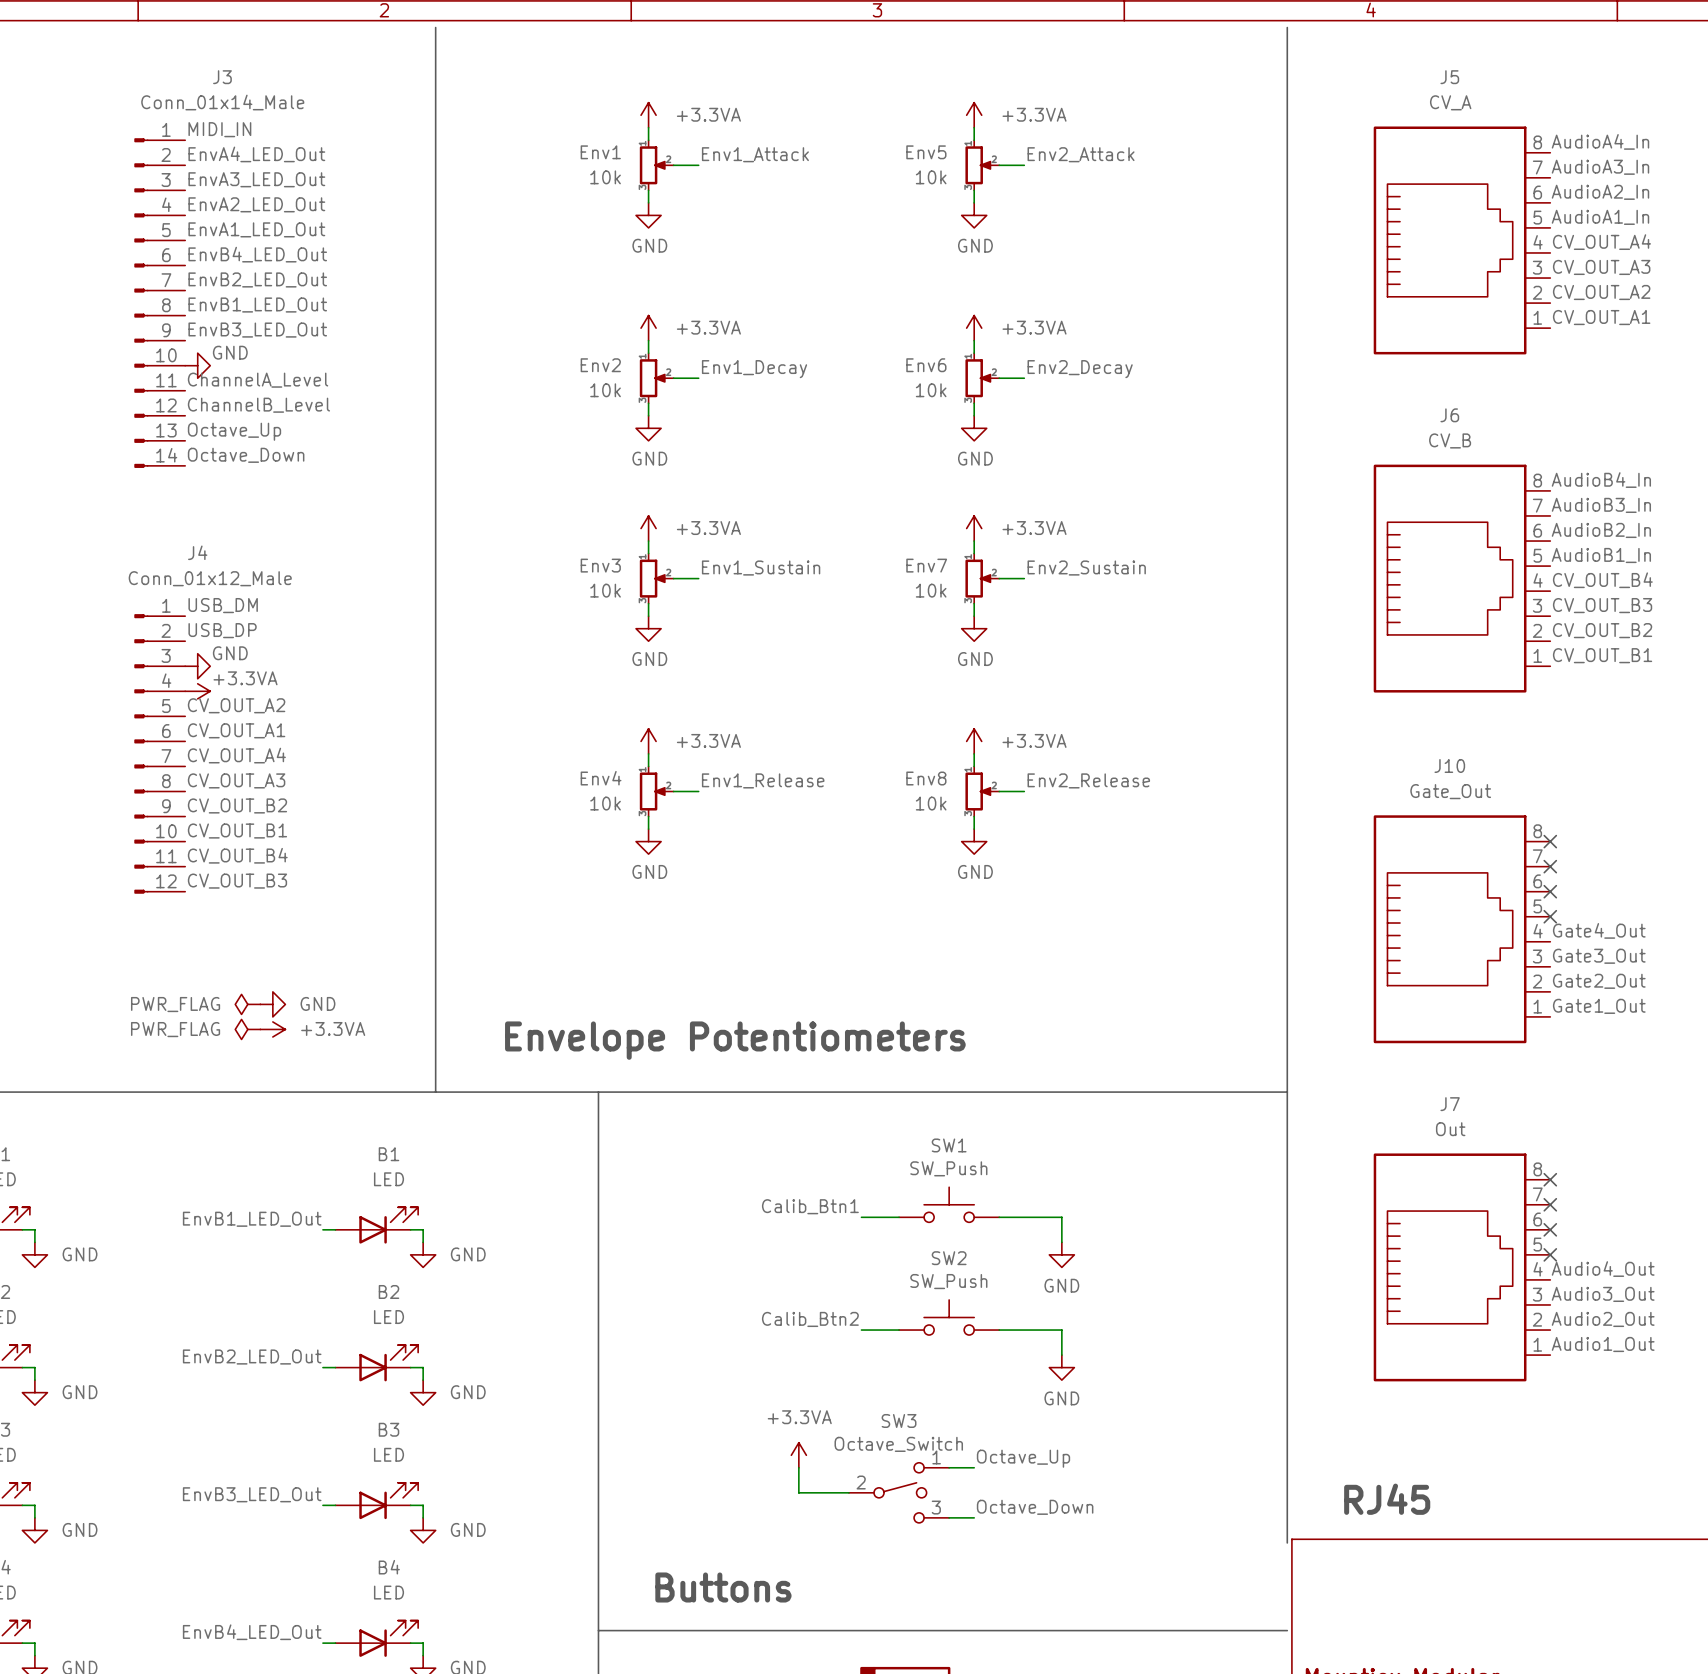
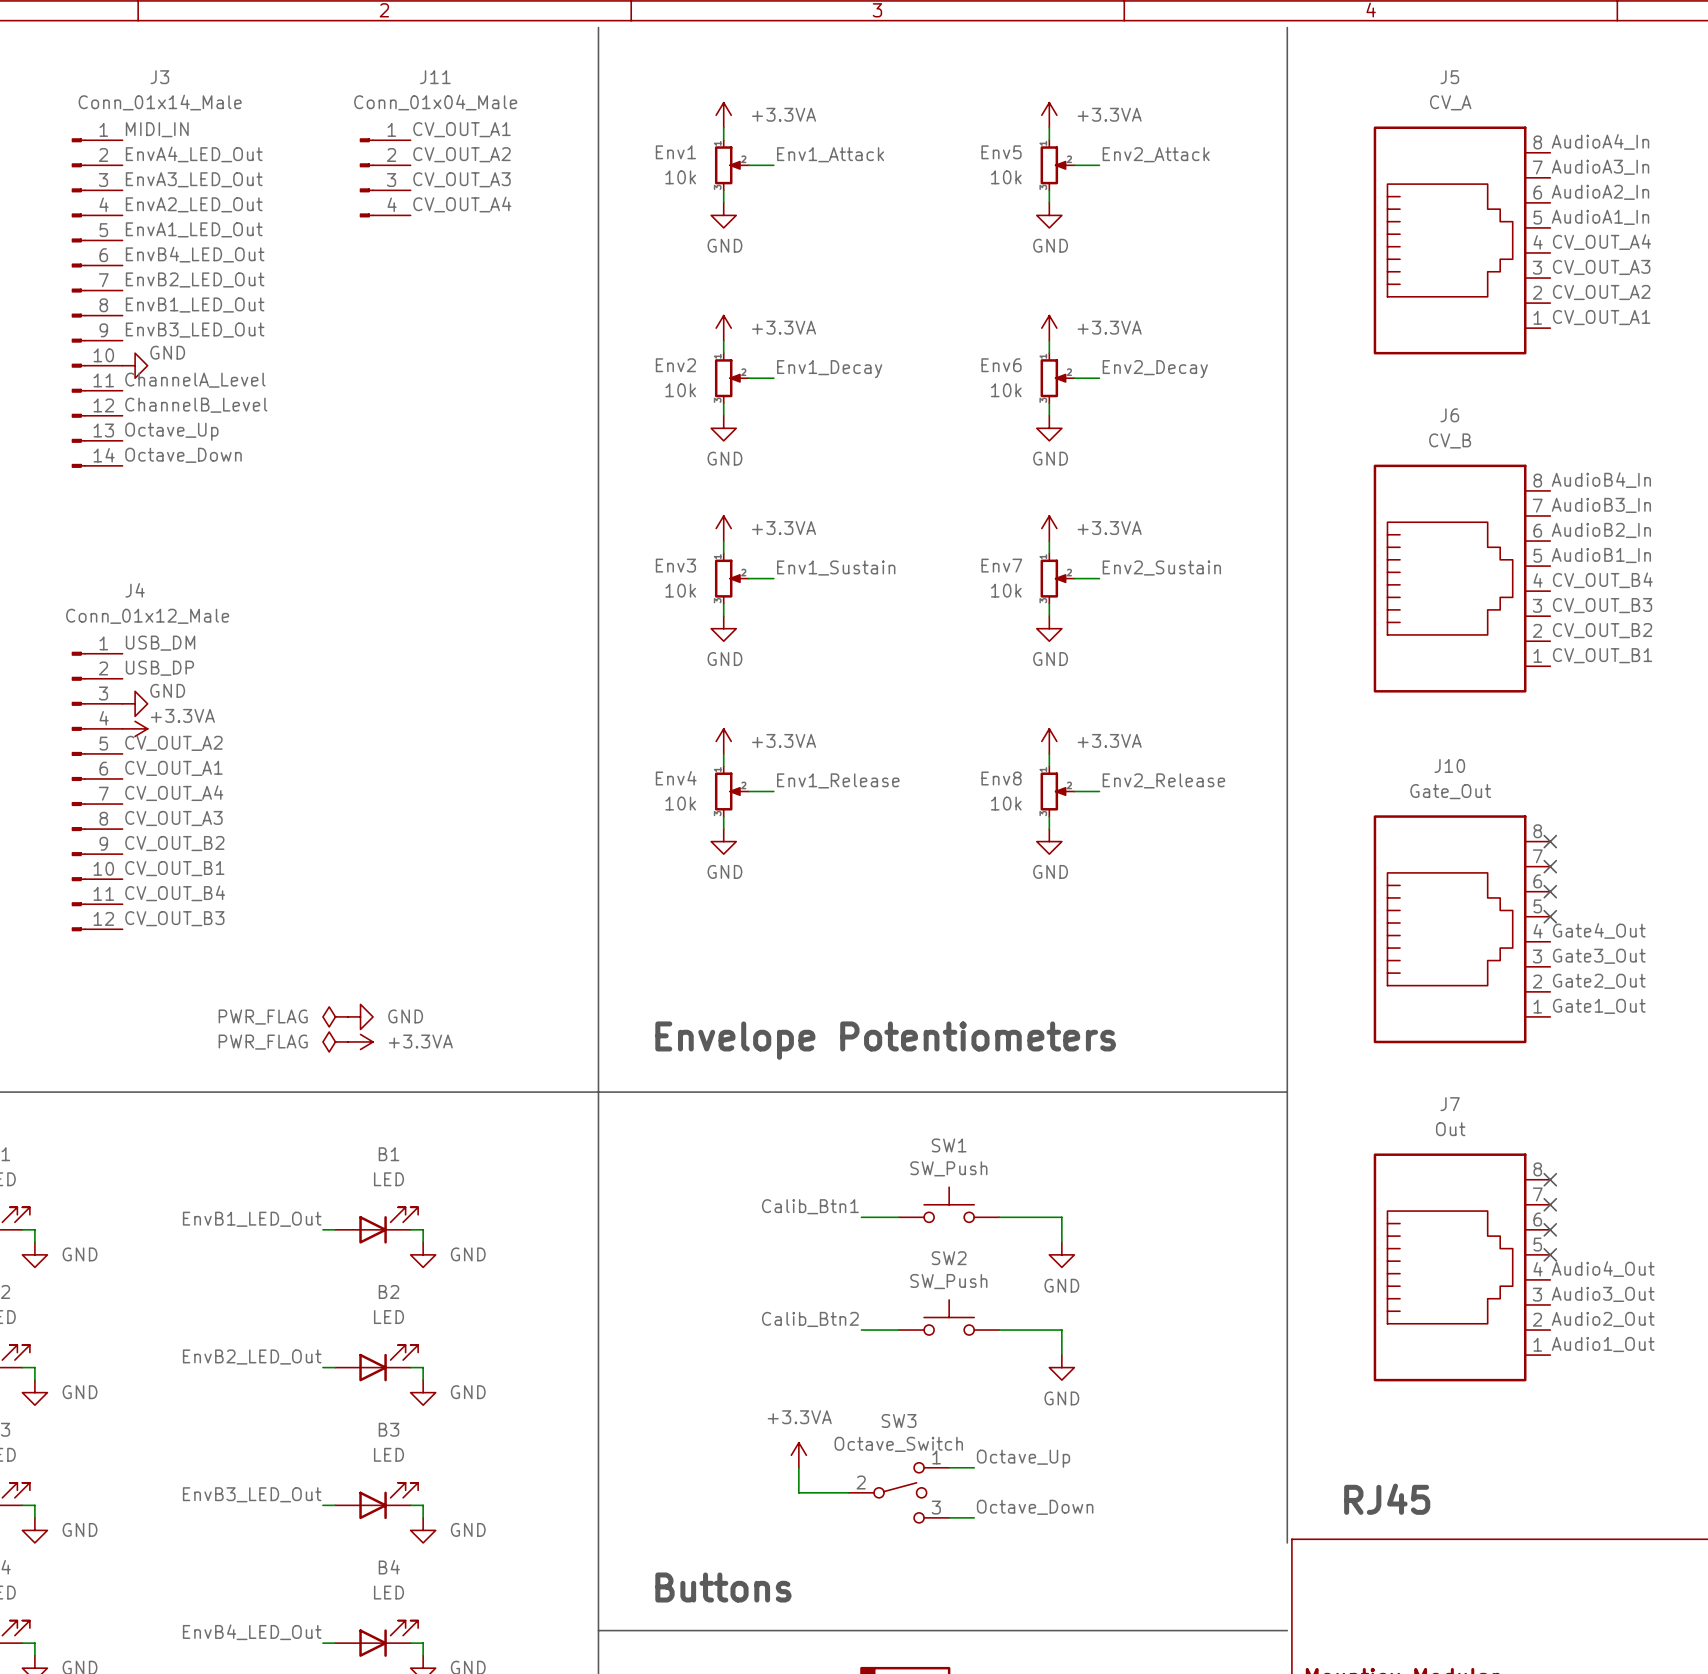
line: (435, 27) (435, 1092) -> (598, 27) (598, 1092)
power symbol position: +3.3VA (648, 115) -> +3.3VA (723, 115)
power symbol position: +3.3VA (974, 115) -> +3.3VA (1049, 115)
wire: (648, 127) (648, 140) -> (723, 127) (723, 140)
wire: (974, 127) (974, 140) -> (1049, 127) (1049, 140)
label position: MIDI_IN (219, 129) -> MIDI_IN (157, 129)
label: none -> CV_OUT_A1 (462, 129)
label position: EnvA4_LED_Out (256, 154) -> EnvA4_LED_Out (194, 154)
label: none -> CV_OUT_A2 (462, 154)
label position: Env1_Attack (755, 154) -> Env1_Attack (830, 154)
label position: Env2_Attack (1081, 154) -> Env2_Attack (1156, 154)
Env1 position: (656, 165) -> (731, 165)
wire: (673, 165) (698, 165) -> (748, 165) (773, 165)
Env5 position: (982, 165) -> (1057, 165)
wire: (999, 165) (1024, 165) -> (1074, 165) (1099, 165)
J11: none -> Conn_01x04_Male (385, 177)
label position: EnvA3_LED_Out (256, 179) -> EnvA3_LED_Out (194, 179)
label: none -> CV_OUT_A3 (462, 179)
wire: (648, 190) (648, 202) -> (723, 190) (723, 202)
wire: (974, 190) (974, 202) -> (1049, 190) (1049, 202)
label position: EnvA2_LED_Out (256, 204) -> EnvA2_LED_Out (194, 204)
label: none -> CV_OUT_A4 (462, 204)
power symbol position: GND (648, 215) -> GND (723, 215)
power symbol position: GND (974, 215) -> GND (1049, 215)
label position: EnvA1_LED_Out (256, 229) -> EnvA1_LED_Out (194, 229)
label position: EnvB4_LED_Out (257, 254) -> EnvB4_LED_Out (195, 254)
label position: EnvB2_LED_Out (257, 279) -> EnvB2_LED_Out (195, 279)
J3 position: (159, 303) -> (97, 303)
label position: EnvB1_LED_Out (257, 305) -> EnvB1_LED_Out (195, 305)
power symbol position: +3.3VA (648, 328) -> +3.3VA (723, 328)
power symbol position: +3.3VA (974, 328) -> +3.3VA (1049, 328)
label position: EnvB3_LED_Out (257, 330) -> EnvB3_LED_Out (195, 330)
wire: (648, 340) (648, 353) -> (723, 340) (723, 353)
wire: (974, 340) (974, 353) -> (1049, 340) (1049, 353)
power symbol position: GND (197, 365) -> GND (135, 365)
label position: Env1_Decay (754, 369) -> Env1_Decay (829, 369)
label position: Env2_Decay (1080, 369) -> Env2_Decay (1155, 369)
Env2 position: (656, 378) -> (731, 378)
wire: (673, 378) (698, 378) -> (748, 378) (773, 378)
Env6 position: (982, 378) -> (1057, 378)
wire: (999, 378) (1024, 378) -> (1074, 378) (1099, 378)
label position: ChannelA_Level (258, 380) -> ChannelA_Level (195, 380)
wire: (648, 403) (648, 415) -> (723, 403) (723, 415)
wire: (974, 403) (974, 415) -> (1049, 403) (1049, 415)
label position: ChannelB_Level (258, 405) -> ChannelB_Level (196, 405)
power symbol position: GND (648, 428) -> GND (723, 428)
power symbol position: GND (974, 428) -> GND (1049, 428)
label position: Octave_Up (234, 431) -> Octave_Up (171, 431)
label position: Octave_Down (246, 455) -> Octave_Down (183, 455)
power symbol position: +3.3VA (648, 528) -> +3.3VA (723, 528)
power symbol position: +3.3VA (974, 528) -> +3.3VA (1049, 528)
wire: (648, 541) (648, 553) -> (723, 541) (723, 553)
wire: (974, 541) (974, 553) -> (1049, 541) (1049, 553)
label position: Env1_Sustain (761, 568) -> Env1_Sustain (836, 568)
label position: Env2_Sustain (1086, 568) -> Env2_Sustain (1161, 568)
Env3 position: (656, 578) -> (731, 578)
wire: (673, 578) (698, 578) -> (748, 578) (773, 578)
Env7 position: (982, 578) -> (1057, 578)
wire: (999, 578) (1024, 578) -> (1074, 578) (1099, 578)
wire: (648, 603) (648, 616) -> (723, 603) (723, 616)
wire: (974, 603) (974, 616) -> (1049, 603) (1049, 616)
label position: USB_DM (223, 605) -> USB_DM (160, 643)
power symbol position: GND (648, 628) -> GND (723, 628)
power symbol position: GND (974, 628) -> GND (1049, 628)
label position: USB_DP (222, 630) -> USB_DP (159, 668)
power symbol position: GND (197, 666) -> GND (135, 703)
power symbol position: +3.3VA (197, 691) -> +3.3VA (135, 728)
label position: CV_OUT_A2 (236, 705) -> CV_OUT_A2 (173, 743)
label position: CV_OUT_A1 (236, 730) -> CV_OUT_A1 (173, 768)
power symbol position: +3.3VA (648, 741) -> +3.3VA (723, 741)
power symbol position: +3.3VA (974, 741) -> +3.3VA (1049, 741)
J4 position: (159, 753) -> (97, 791)
wire: (648, 753) (648, 766) -> (723, 753) (723, 766)
wire: (974, 753) (974, 766) -> (1049, 753) (1049, 766)
label position: CV_OUT_A4 (236, 755) -> CV_OUT_A4 (174, 793)
label position: CV_OUT_A3 (236, 780) -> CV_OUT_A3 (173, 818)
label position: Env1_Release (763, 780) -> Env1_Release (838, 780)
label position: Env2_Release (1088, 780) -> Env2_Release (1163, 780)
Env4 position: (656, 791) -> (731, 791)
wire: (673, 791) (698, 791) -> (748, 791) (773, 791)
Env8 position: (982, 791) -> (1057, 791)
wire: (999, 791) (1024, 791) -> (1074, 791) (1099, 791)
label position: CV_OUT_B2 (237, 805) -> CV_OUT_B2 (174, 843)
wire: (648, 816) (648, 829) -> (723, 816) (723, 829)
wire: (974, 816) (974, 829) -> (1049, 816) (1049, 829)
label position: CV_OUT_B1 (237, 831) -> CV_OUT_B1 (174, 868)
power symbol position: GND (648, 841) -> GND (723, 841)
power symbol position: GND (974, 841) -> GND (1049, 841)
label position: CV_OUT_B4 (237, 855) -> CV_OUT_B4 (175, 893)
label position: CV_OUT_B3 (237, 881) -> CV_OUT_B3 (174, 918)
power symbol: PWR_FLAG (247, 1004) -> none
power symbol position: GND (272, 1004) -> GND (360, 1016)
power symbol: none -> PWR_FLAG (335, 1016)
power symbol: PWR_FLAG (247, 1029) -> none
power symbol position: +3.3VA (272, 1029) -> +3.3VA (360, 1041)
text position: Envelope Potentiometers (735, 1040) -> Envelope Potentiometers (885, 1040)
power symbol: none -> PWR_FLAG (335, 1041)

